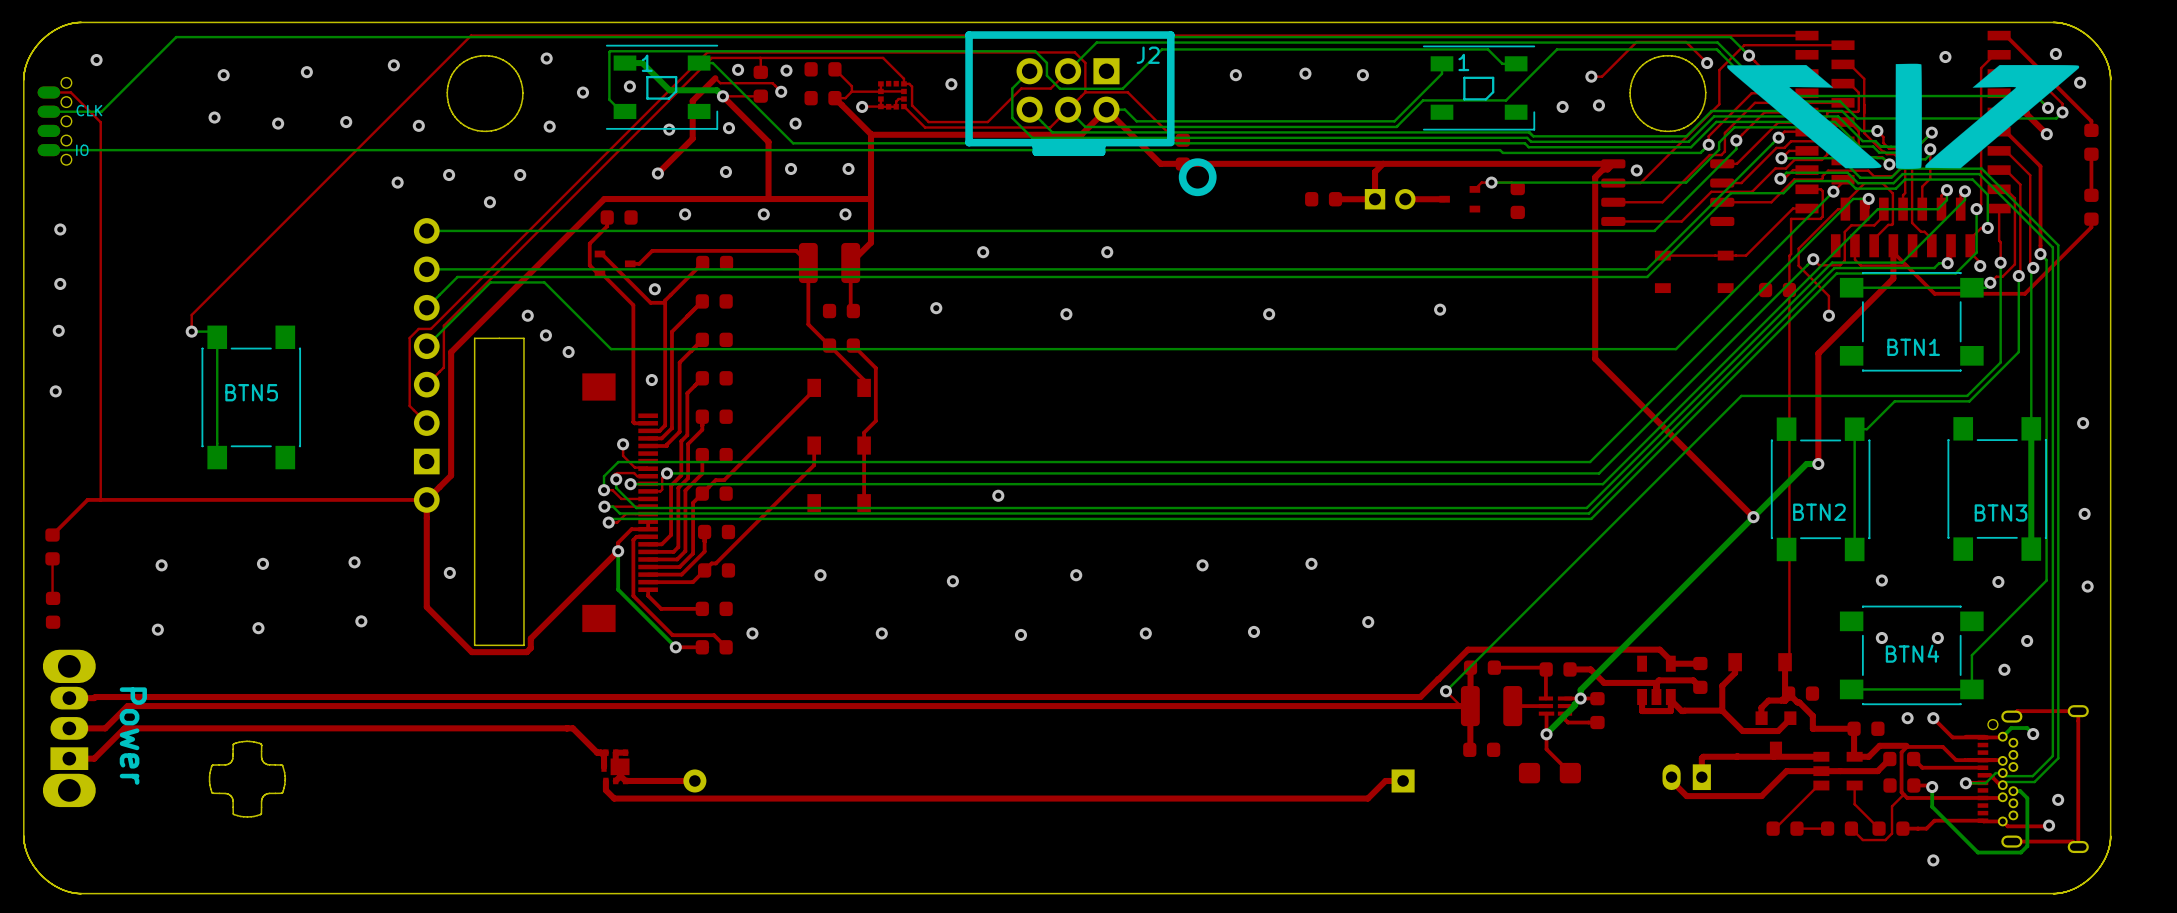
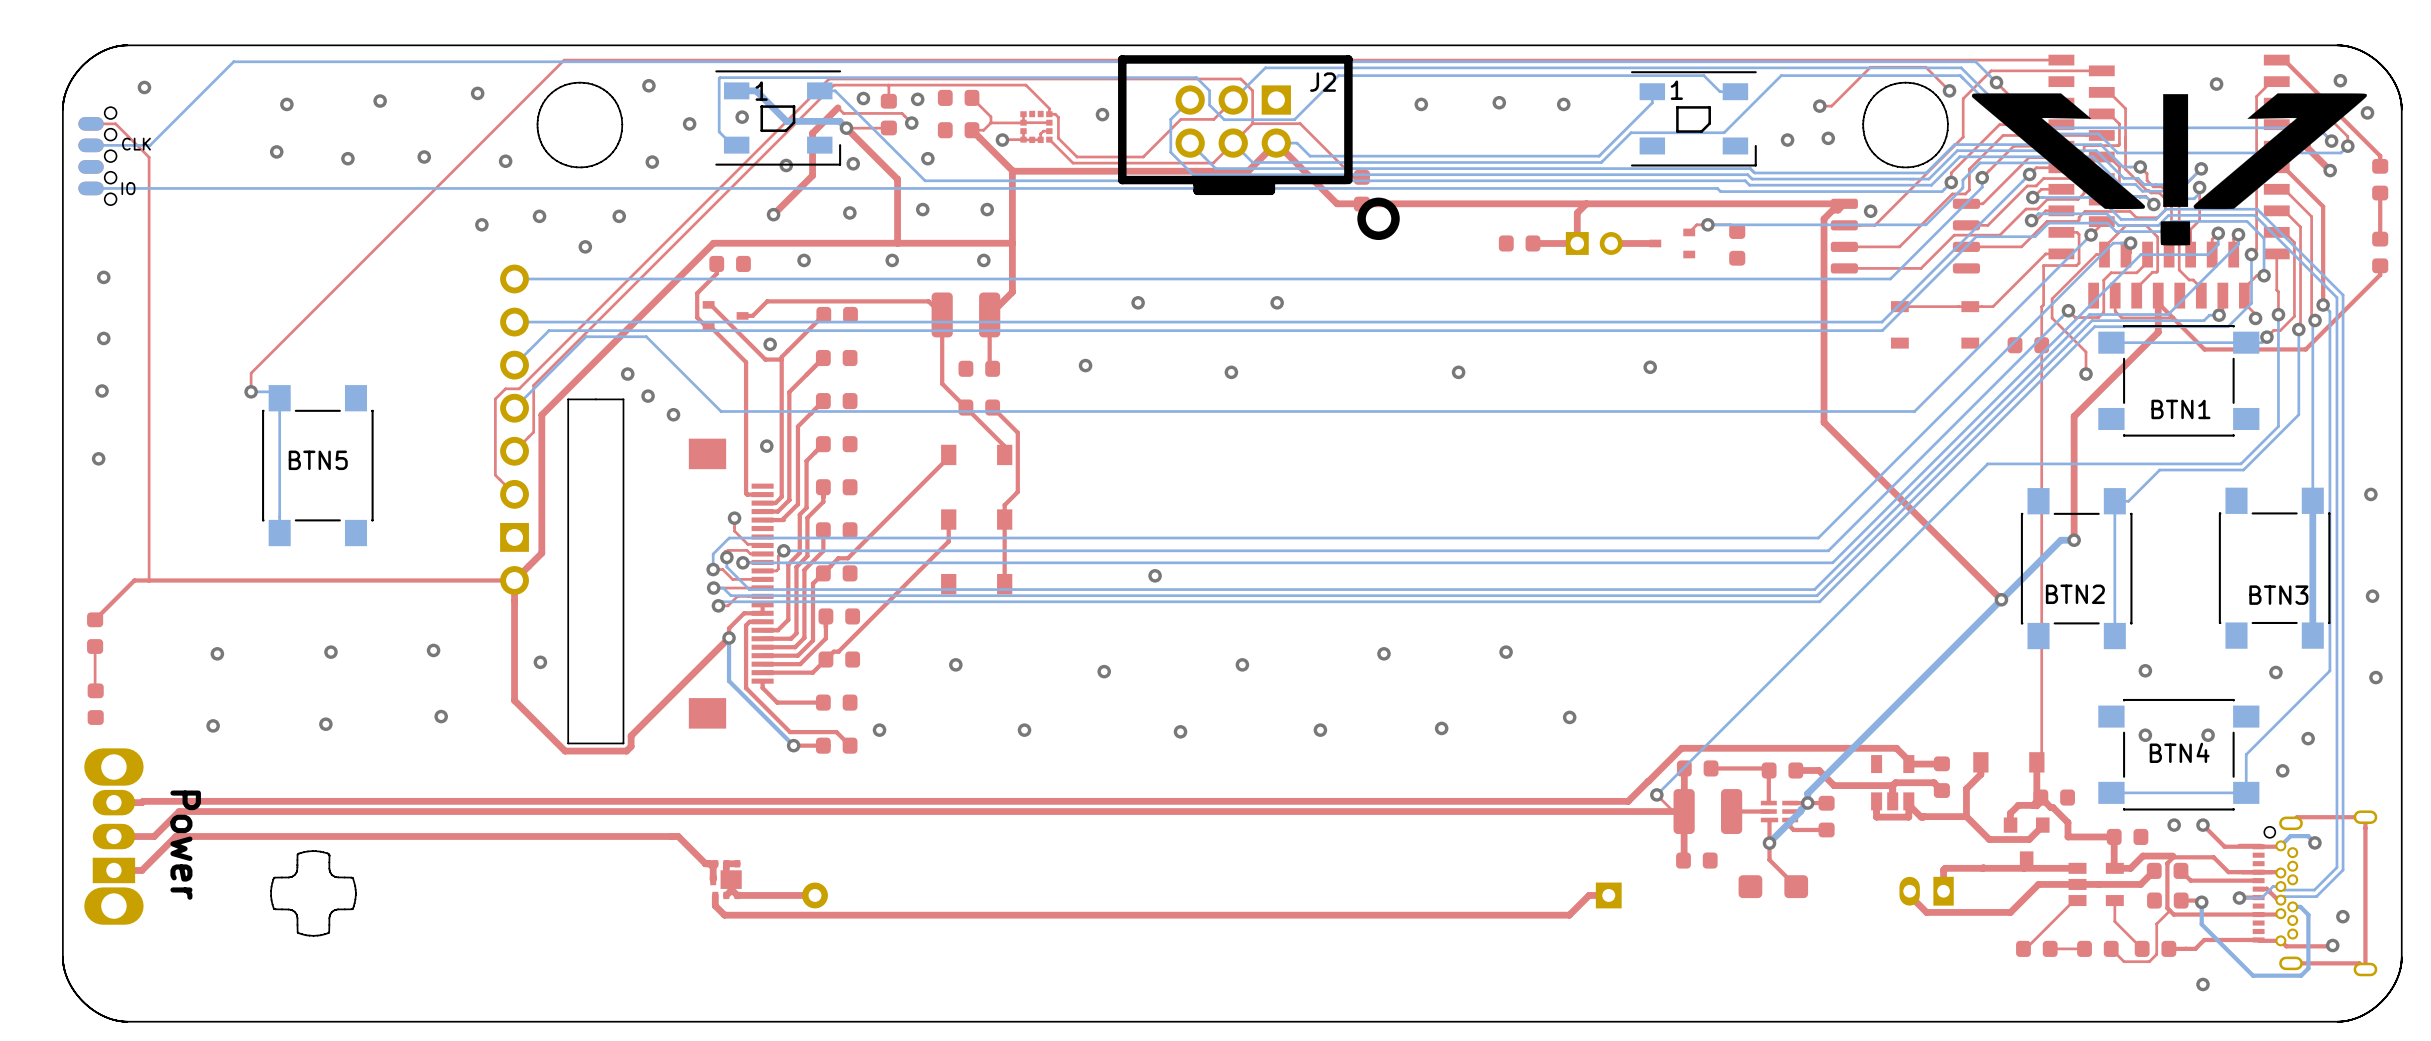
drawing shape: [23, 21, 2112, 895] -> [62, 44, 2403, 1023]

